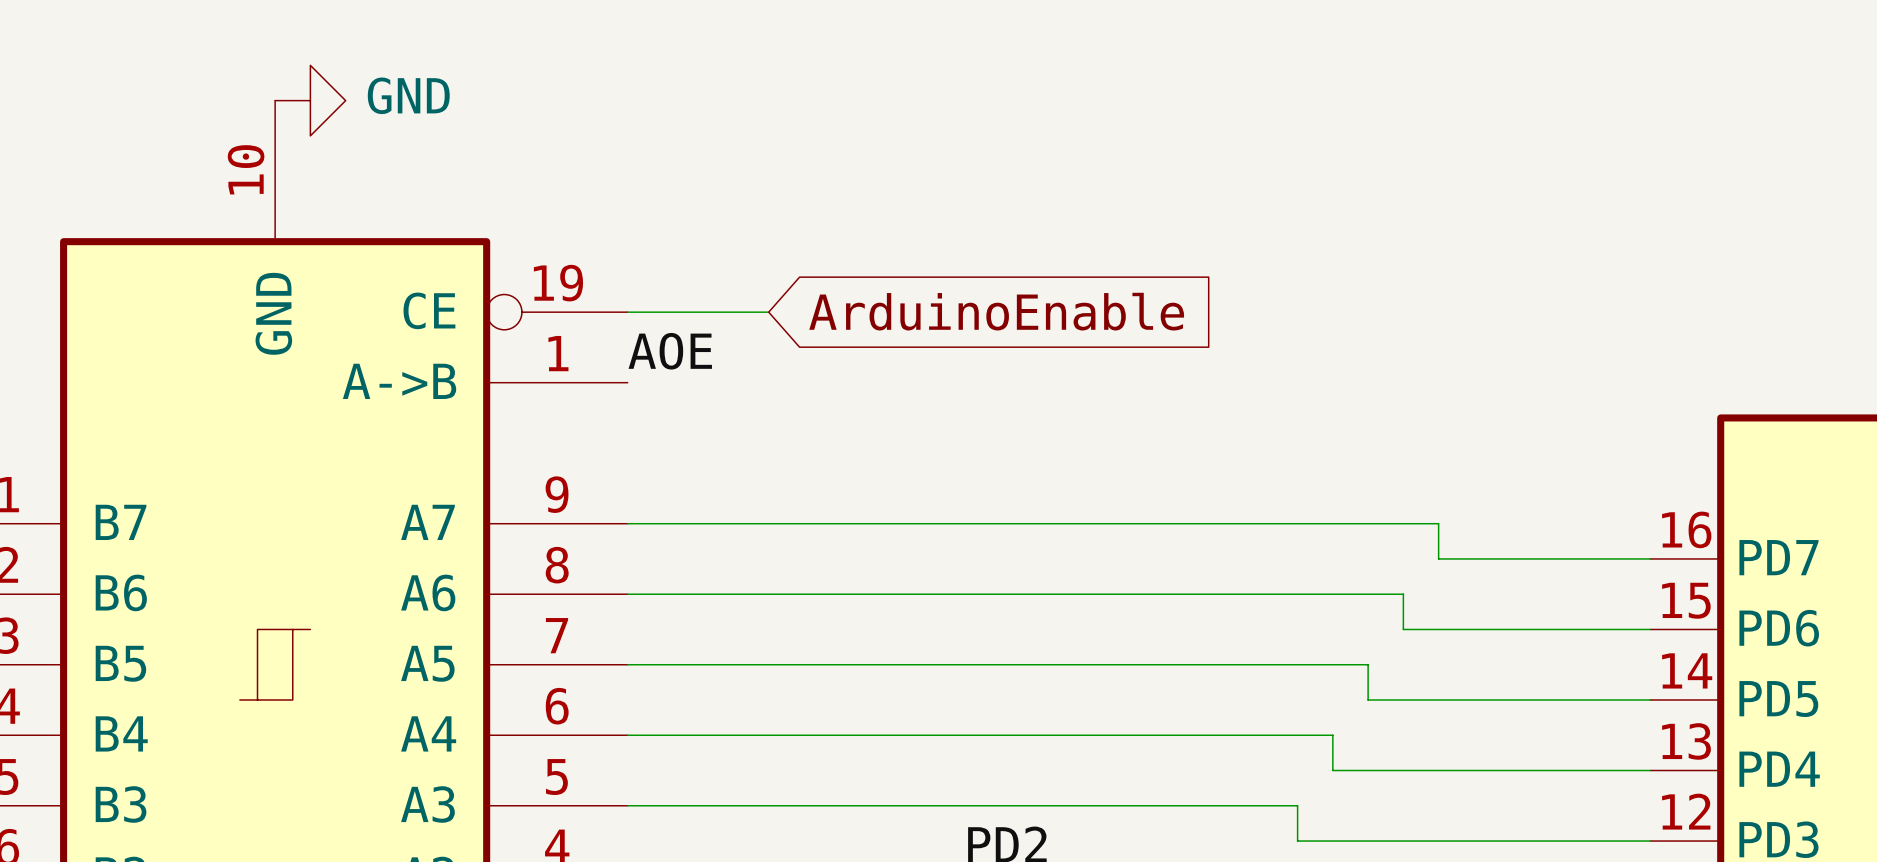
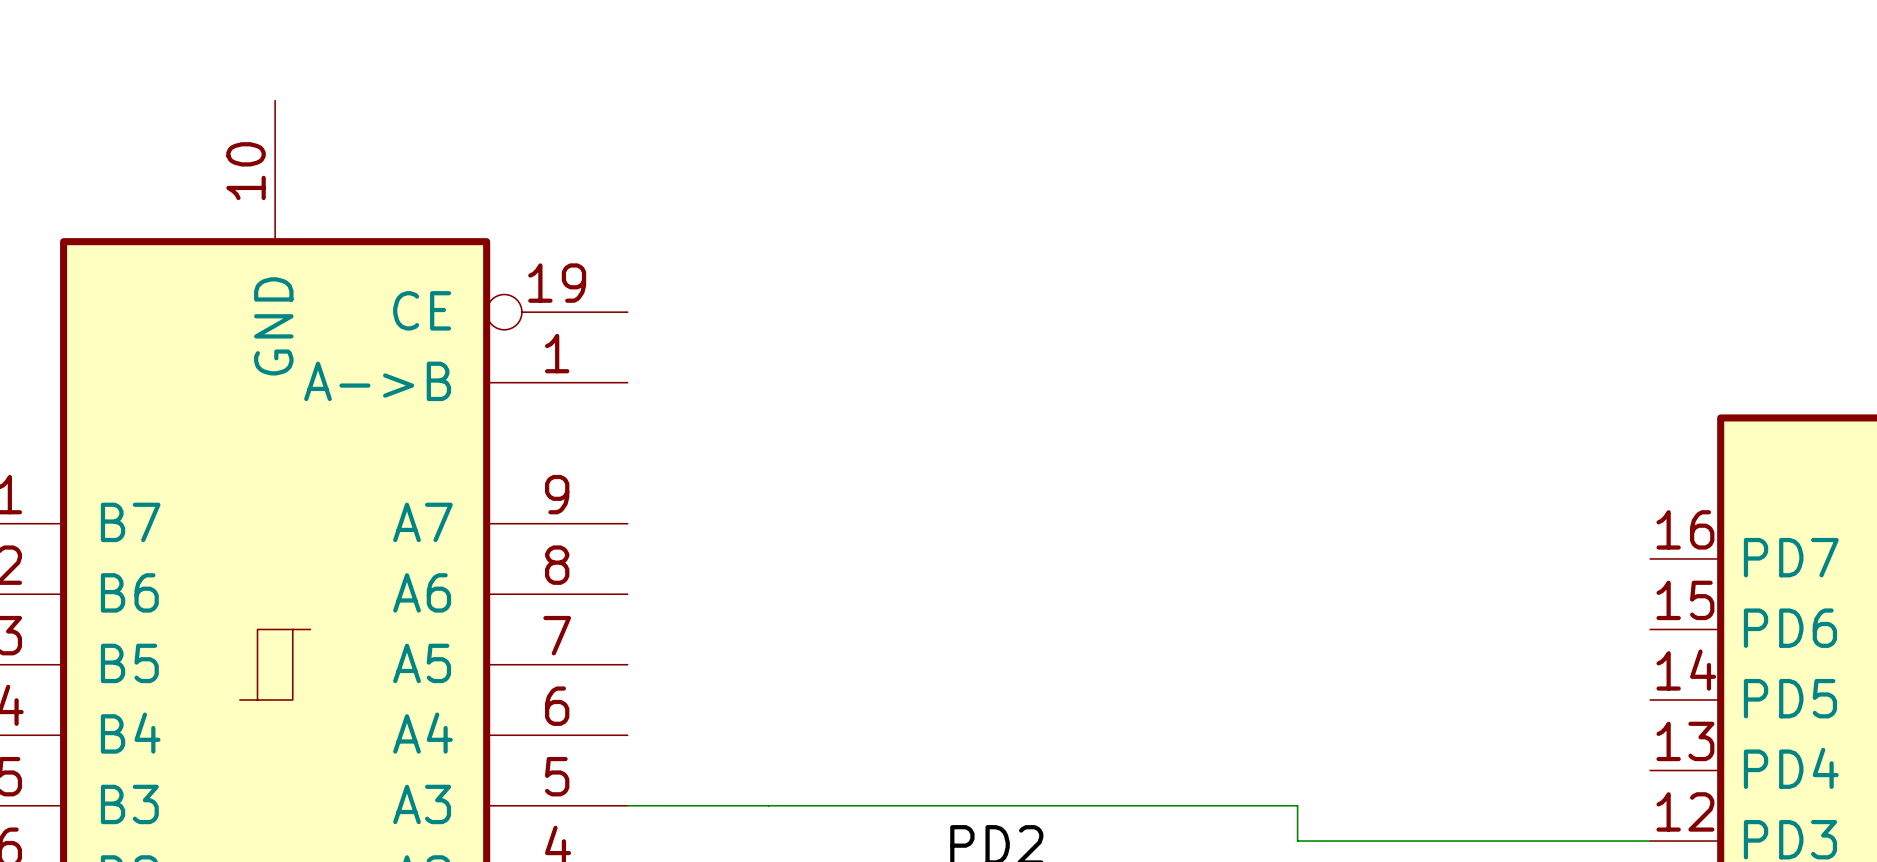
power symbol: GND (310, 100) -> none
global label: ArduinoEnable (996, 311) -> none
wire: (627, 312) (768, 312) -> none
label: AOE (670, 351) -> none
wire: (627, 523) (1438, 523) (1438, 558) (1650, 558) -> none
wire: (627, 594) (1403, 594) (1403, 629) (1650, 629) -> none
wire: (627, 664) (1368, 664) (1368, 700) (1650, 700) -> none
wire: (627, 735) (1332, 735) (1332, 770) (1650, 770) -> none

